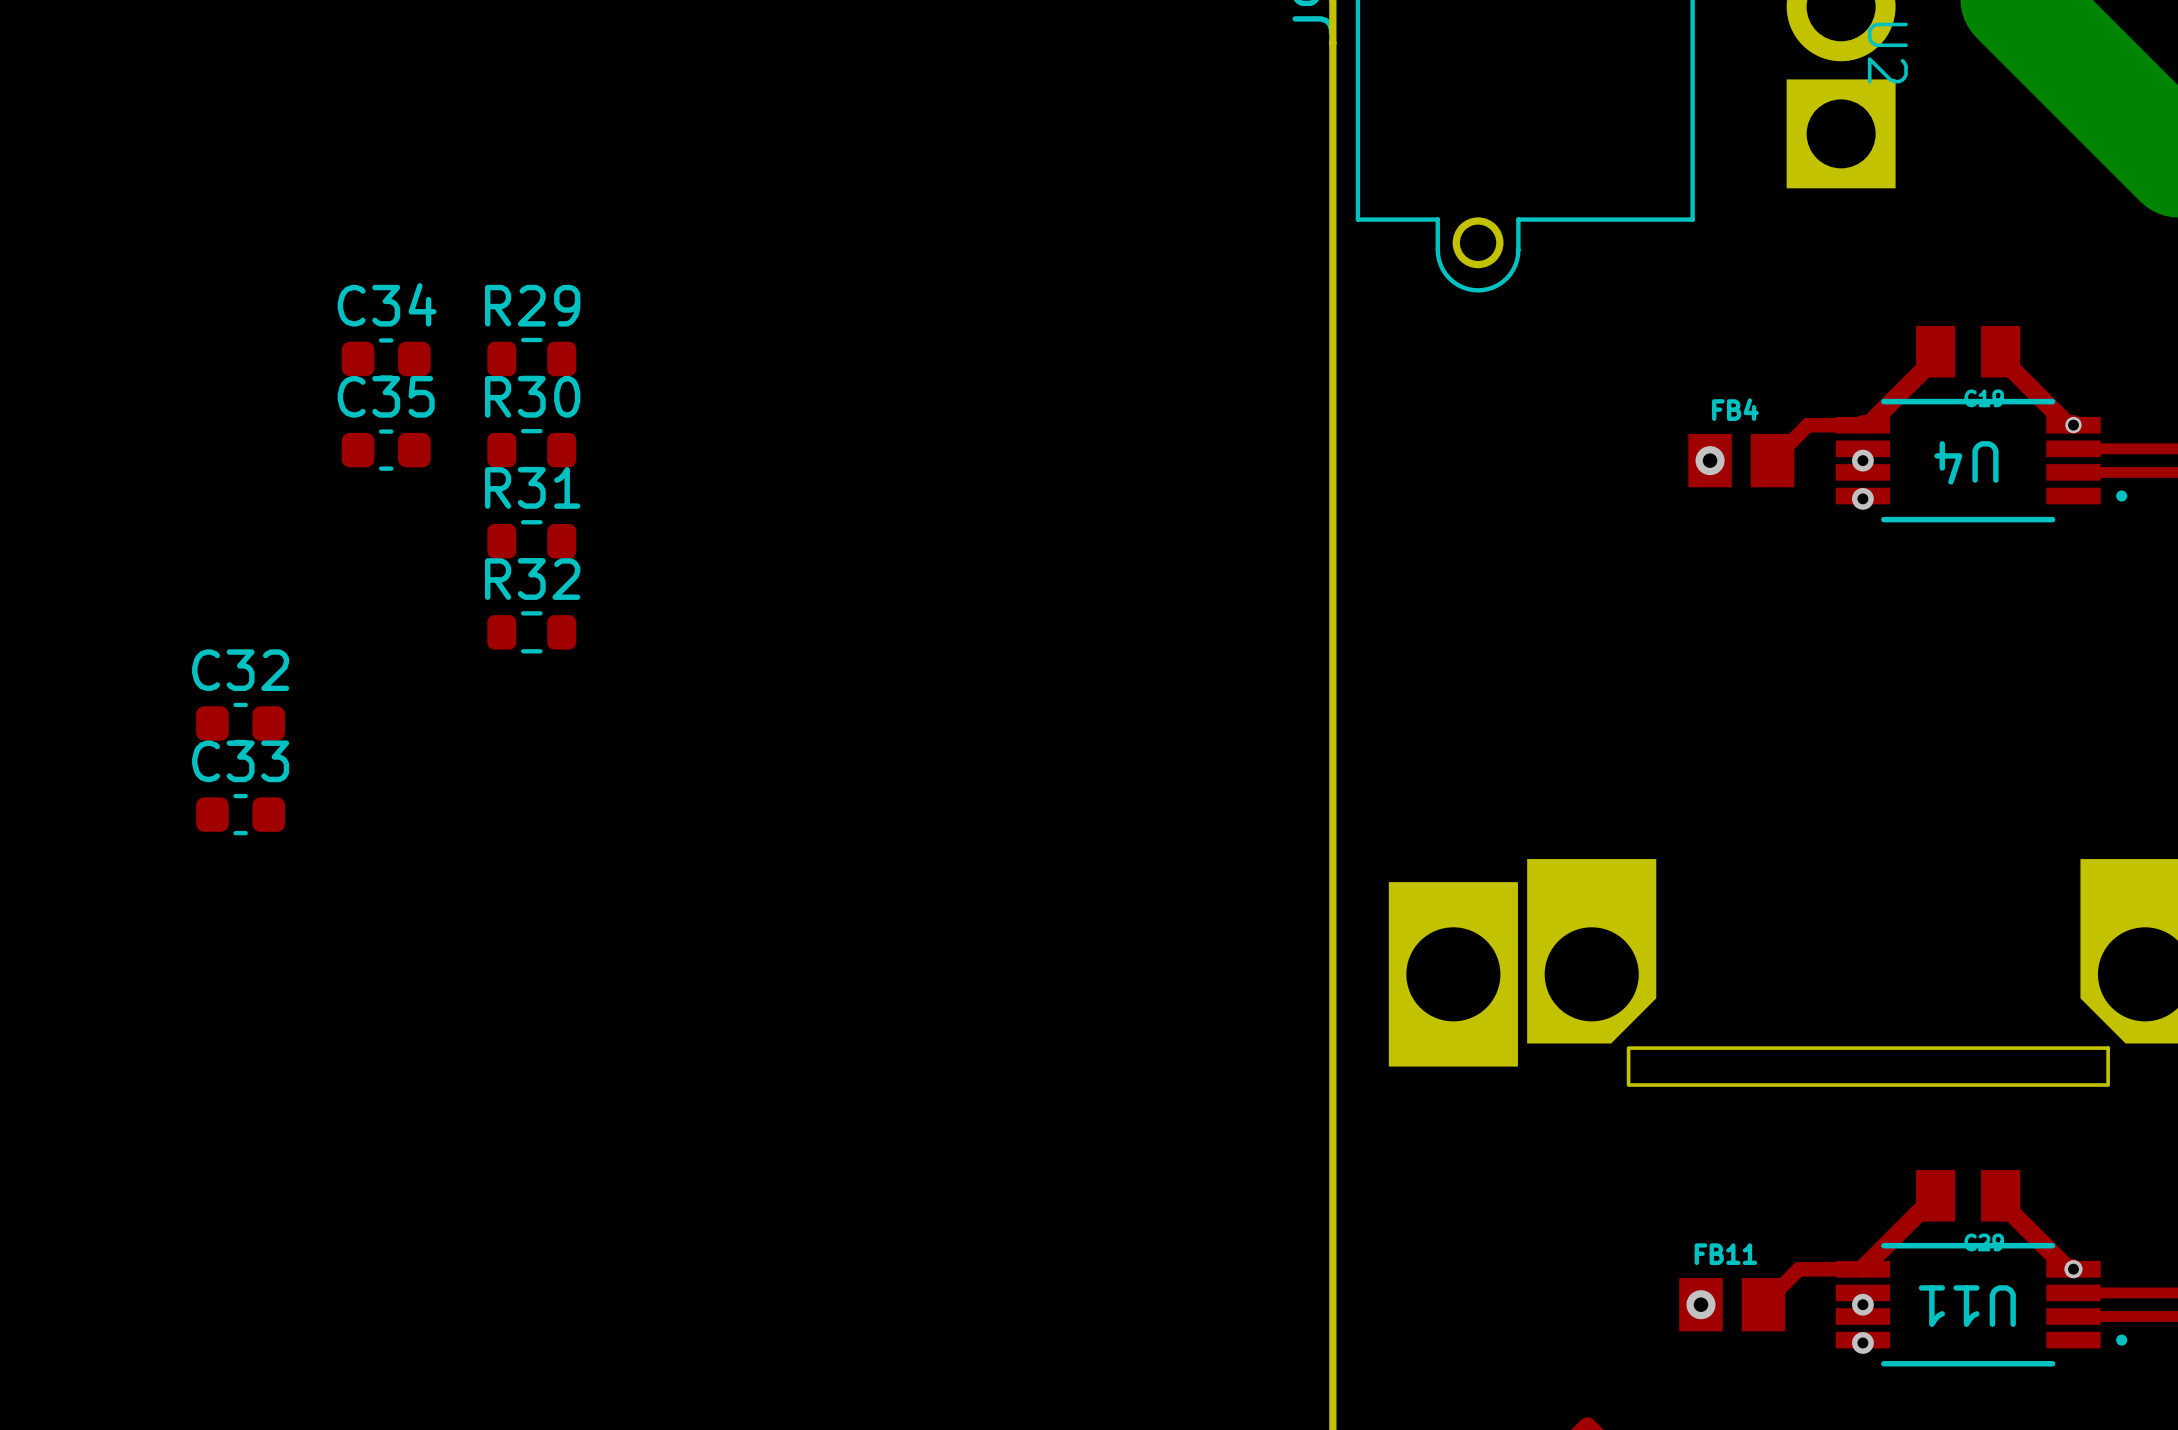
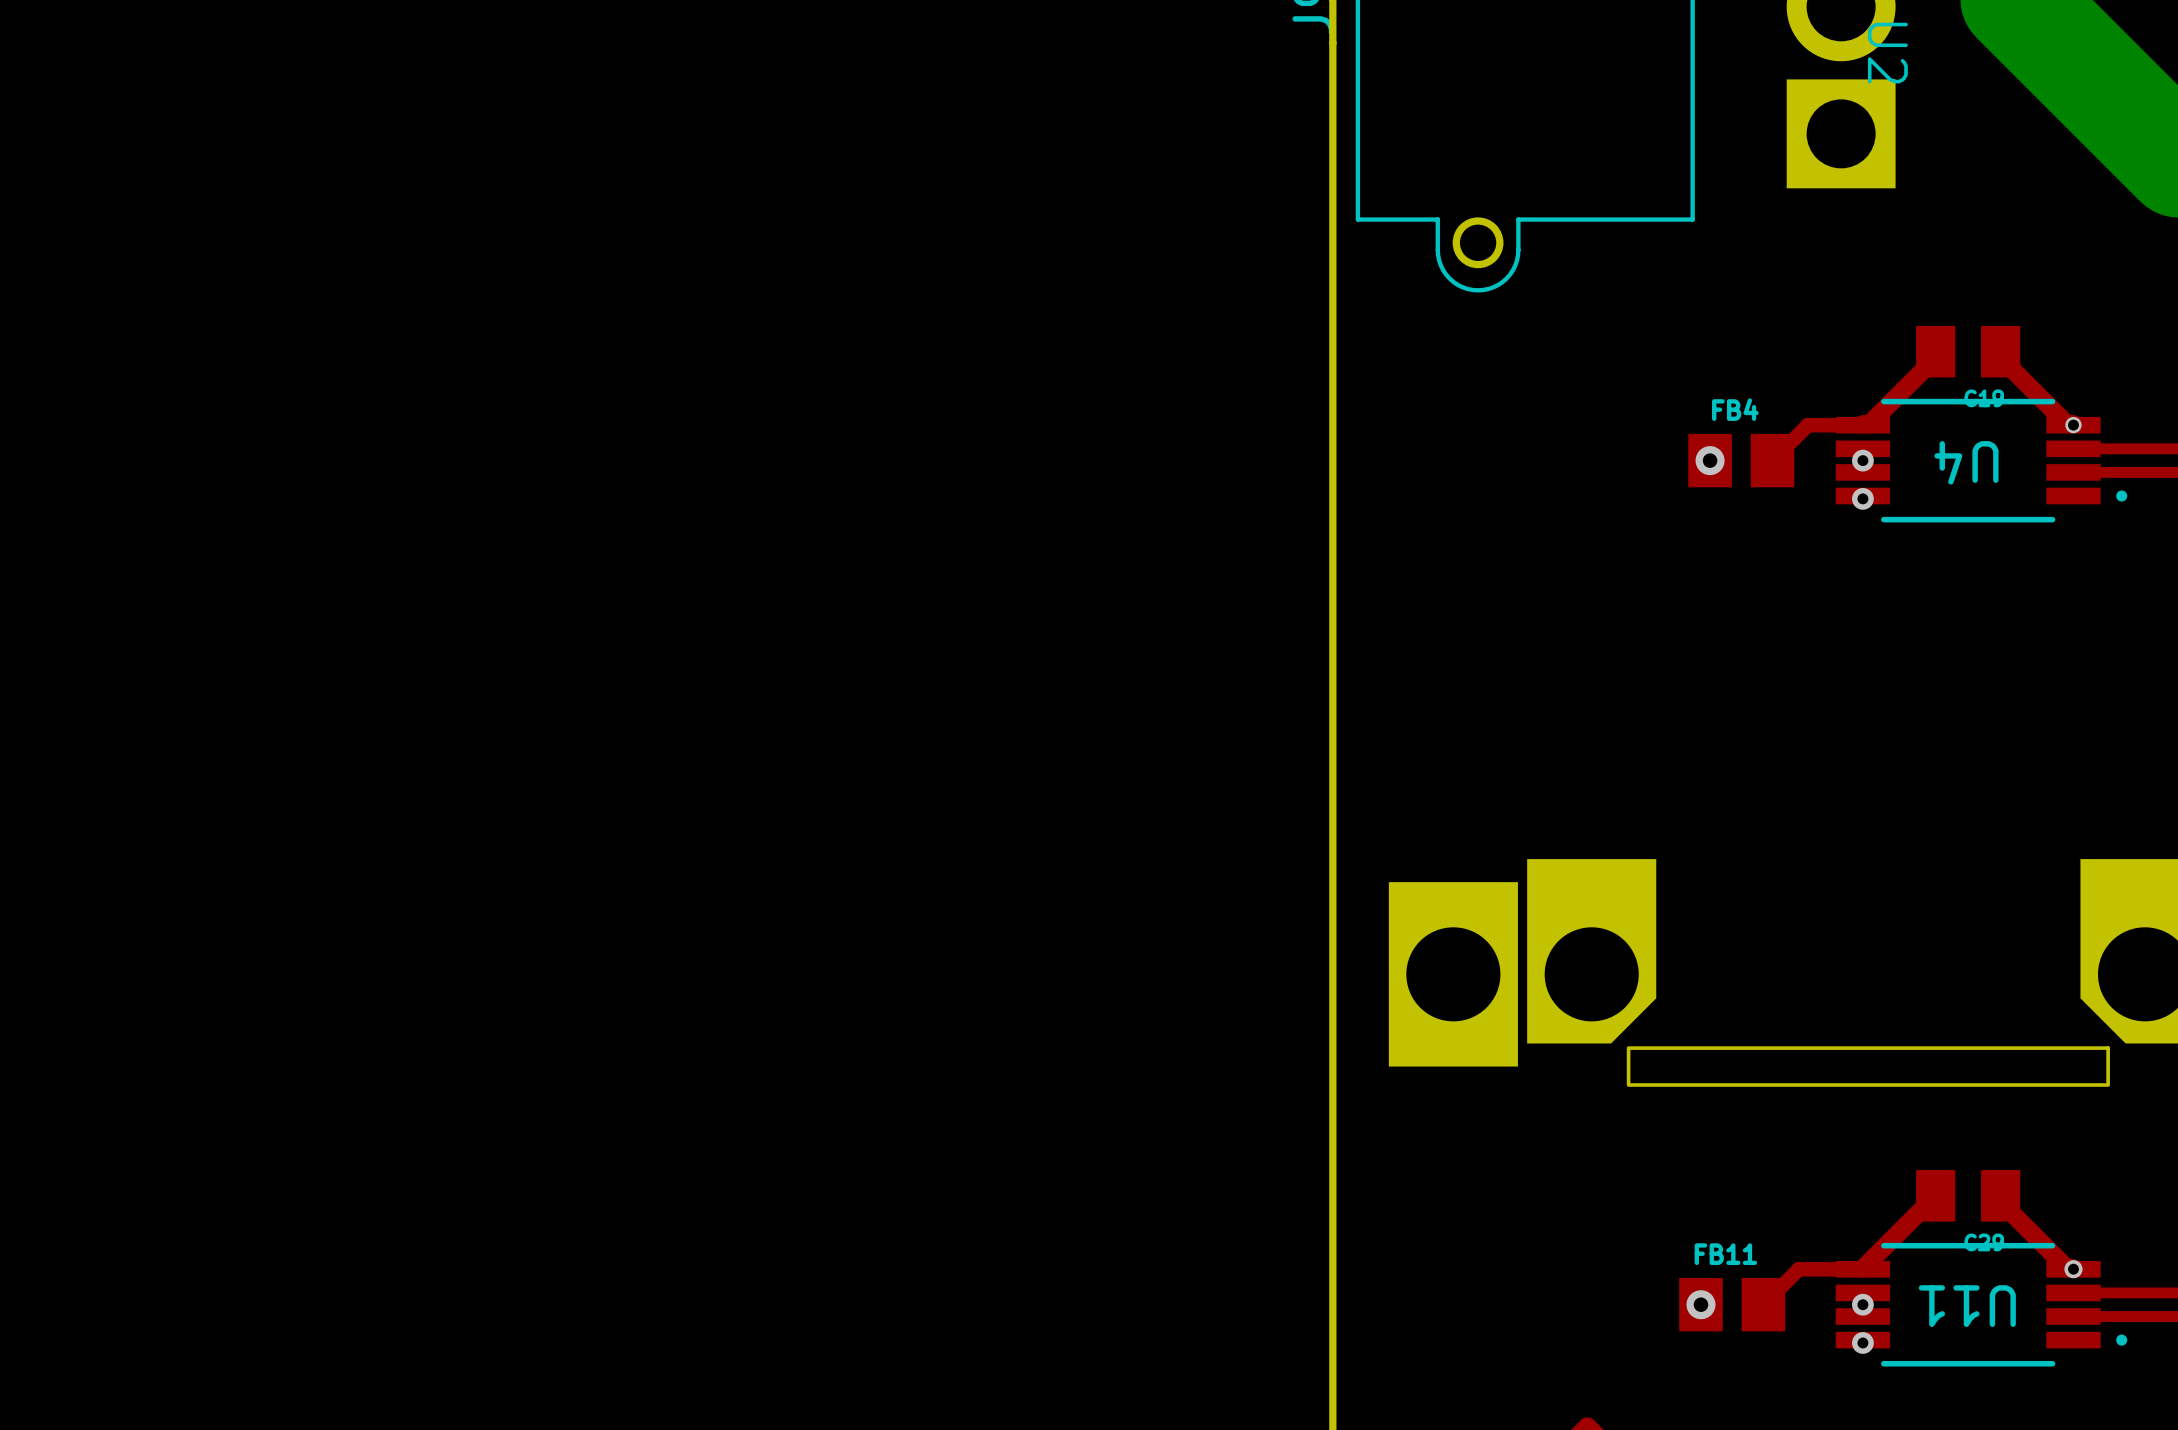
C34: (386, 358) -> none
R29: (531, 358) -> none
C35: (386, 450) -> none
R30: (531, 450) -> none
R31: (531, 541) -> none
R32: (531, 632) -> none
C32: (240, 723) -> none
C33: (240, 814) -> none

